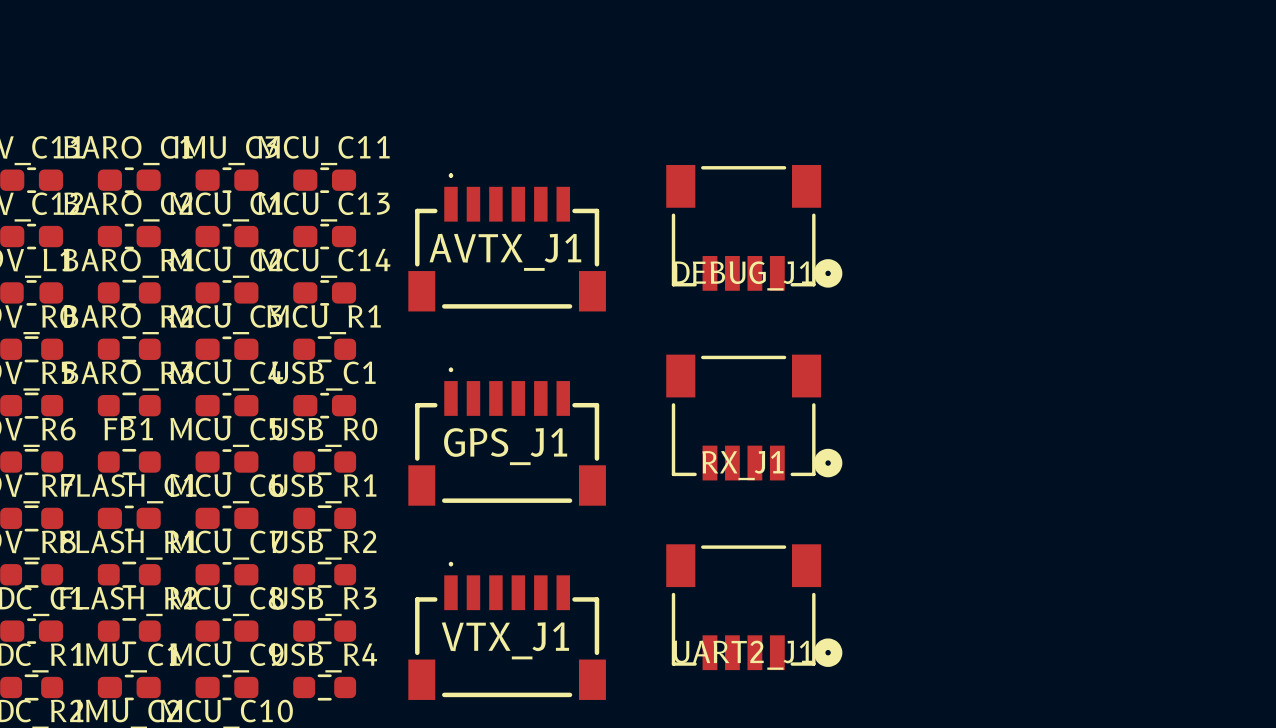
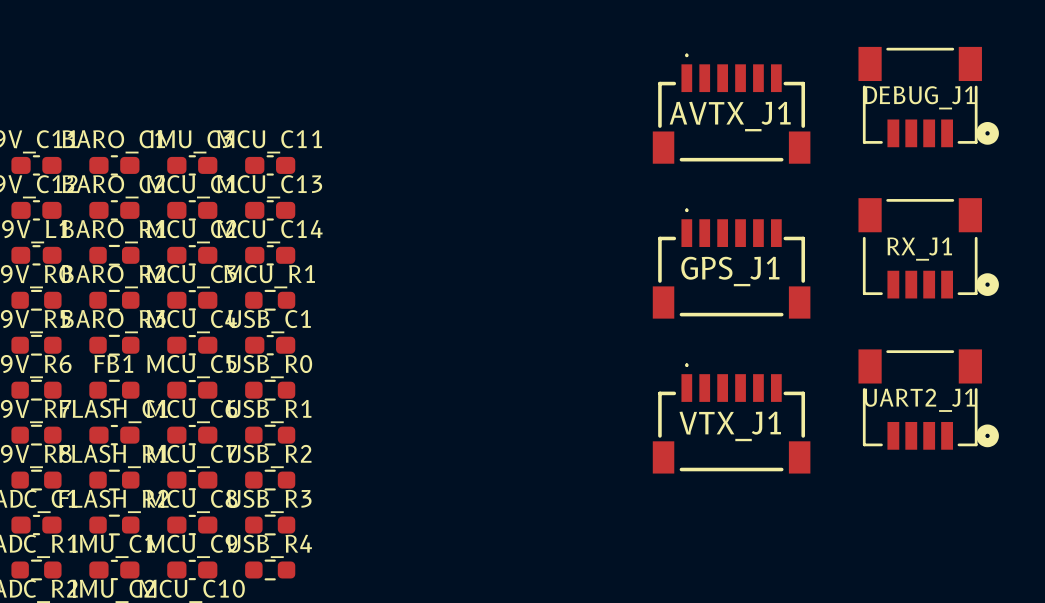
DEBUG_J1 position: (754, 227) -> (928, 97)
AVTX_J1 position: (507, 242) -> (731, 108)
DEBUG_J1 name position: DEBUG_J1 (743, 275) -> DEBUG_J1 (919, 97)
RX_J1 position: (754, 417) -> (928, 248)
GPS_J1 position: (507, 436) -> (731, 263)
RX_J1 name position: RX_J1 (742, 465) -> RX_J1 (919, 249)
UART2_J1 position: (754, 607) -> (928, 399)
VTX_J1 position: (507, 630) -> (731, 418)
UART2_J1 name position: UART2_J1 (742, 655) -> UART2_J1 (919, 400)

